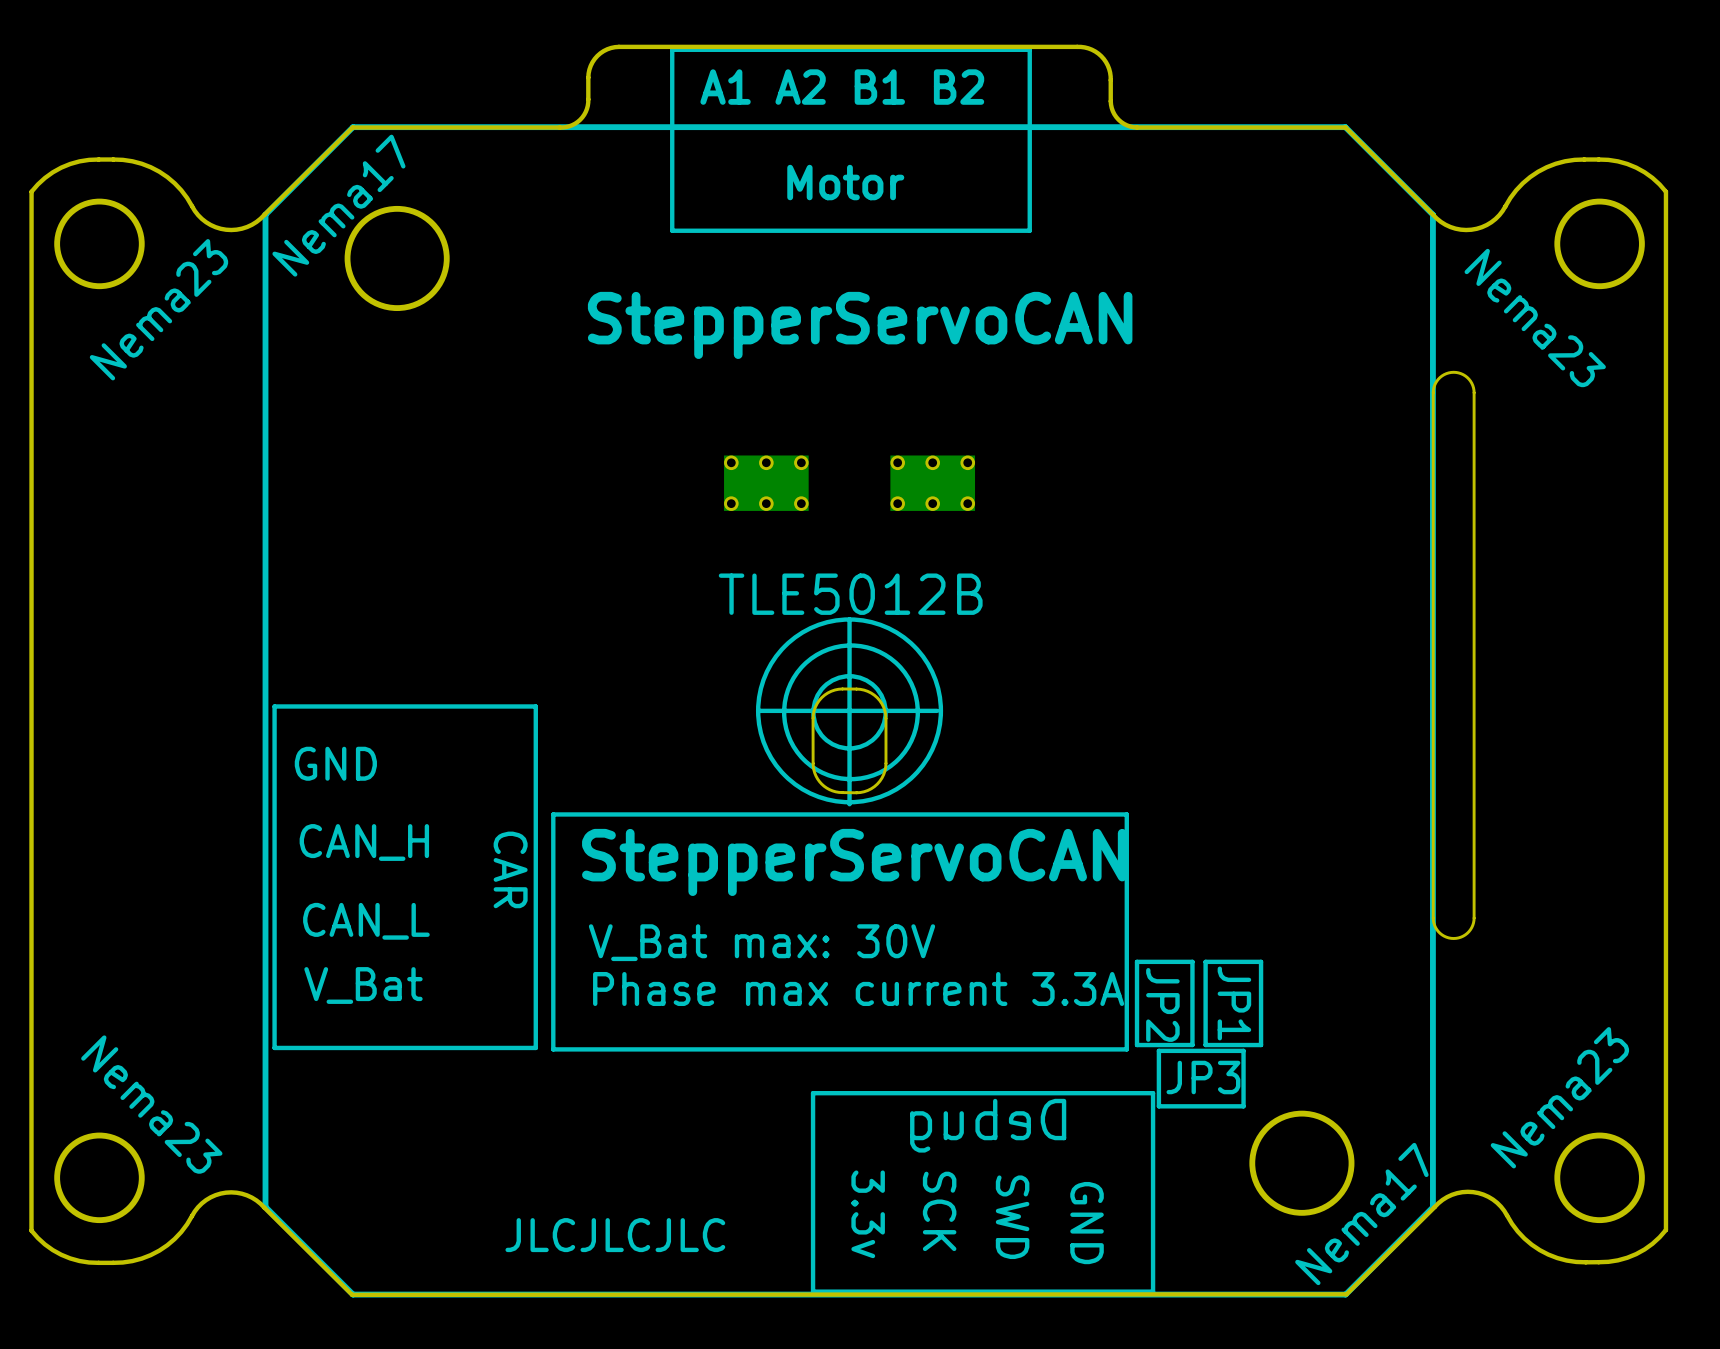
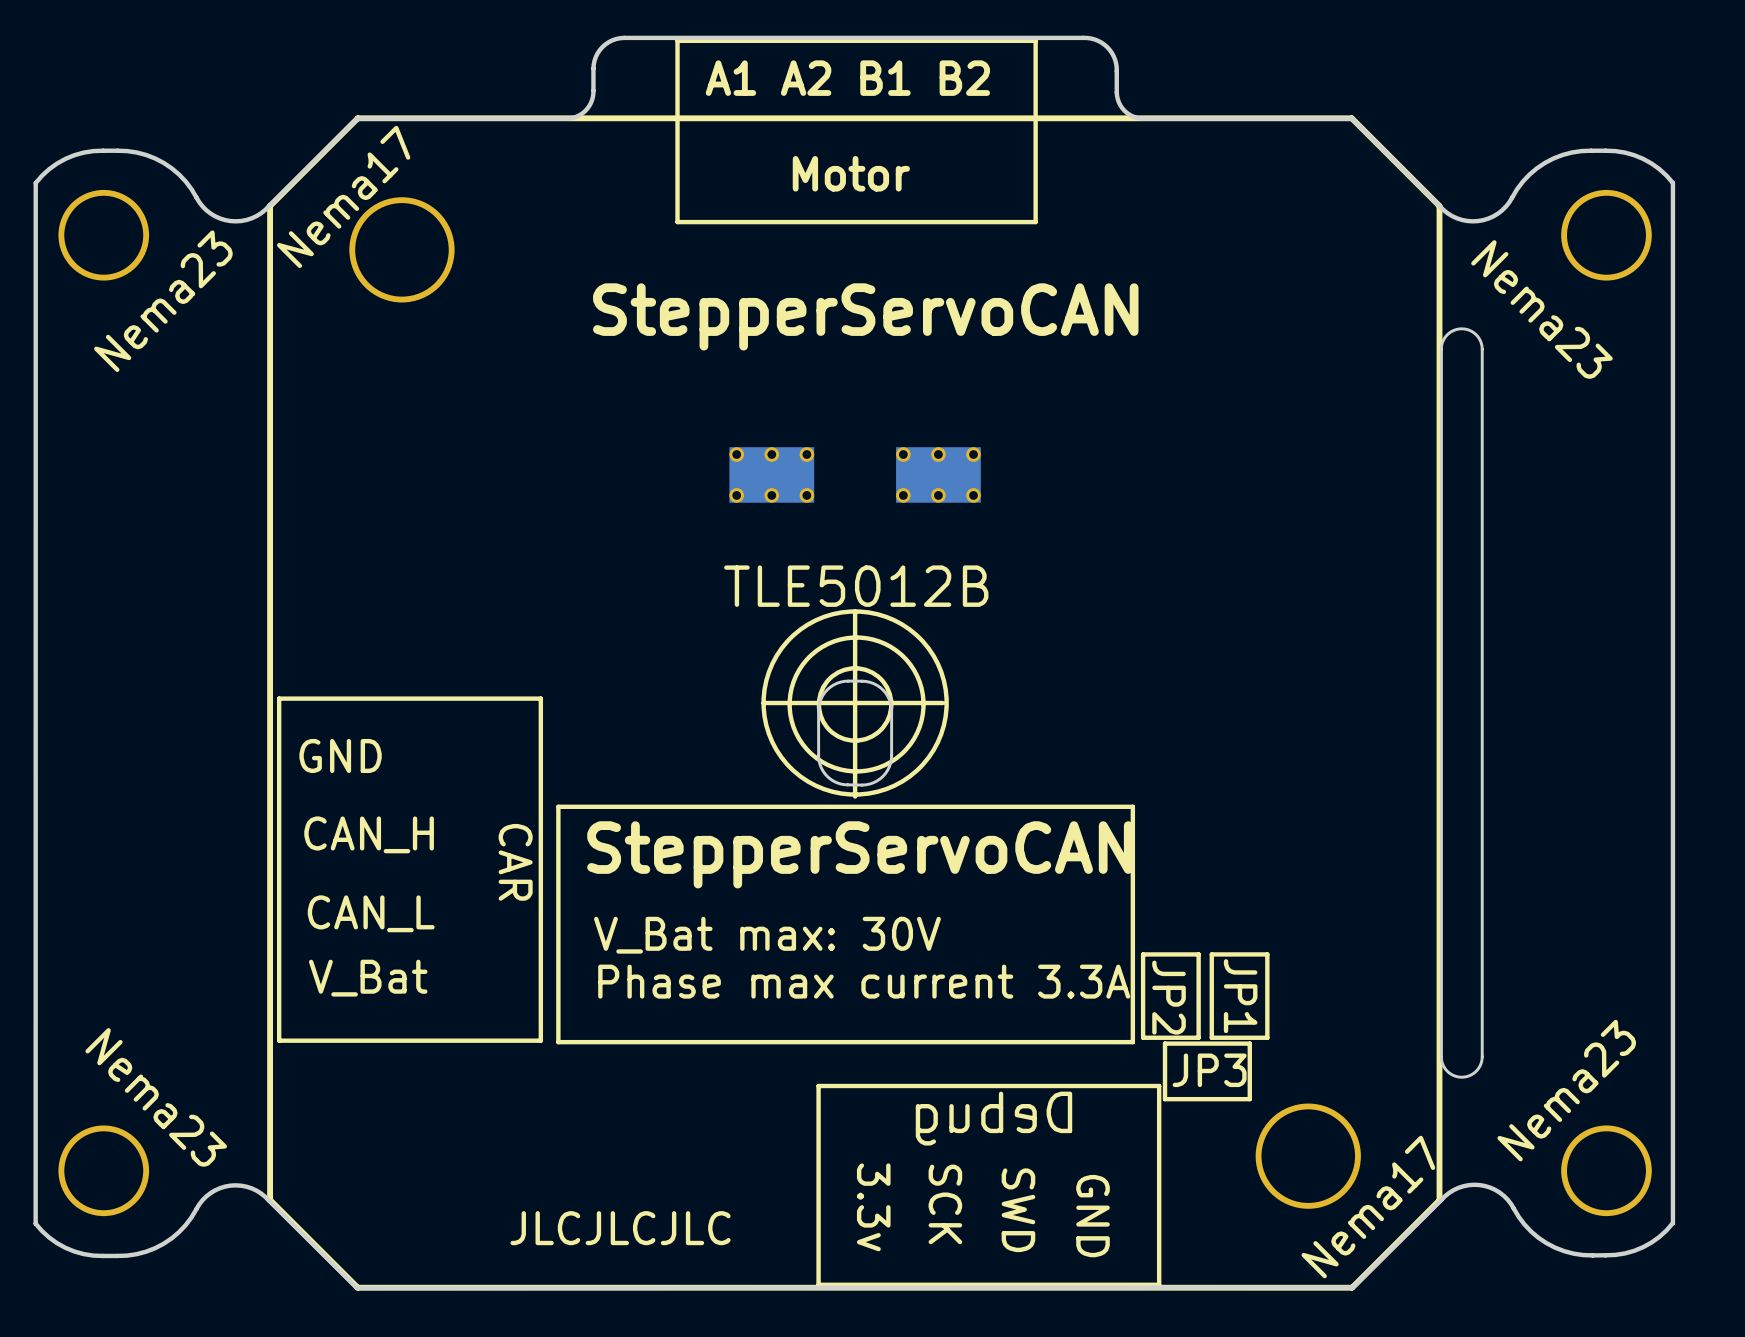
board edge: (1474, 392) (1474, 918) (1468, 931) (1460, 937) (1453, 938) (1446, 937) (1438, 931) (1433, 918) (1433, 392) (1435, 383) (1440, 377) (1453, 372) (1463, 374) (1468, 379) (1474, 392) -> (1482, 349) (1482, 1056) (1477, 1070) (1471, 1074) (1461, 1077) (1452, 1074) (1446, 1070) (1441, 1056) (1441, 349) (1442, 341) (1447, 334) (1453, 330) (1461, 328) (1469, 330) (1476, 334) (1480, 341) (1482, 349)

